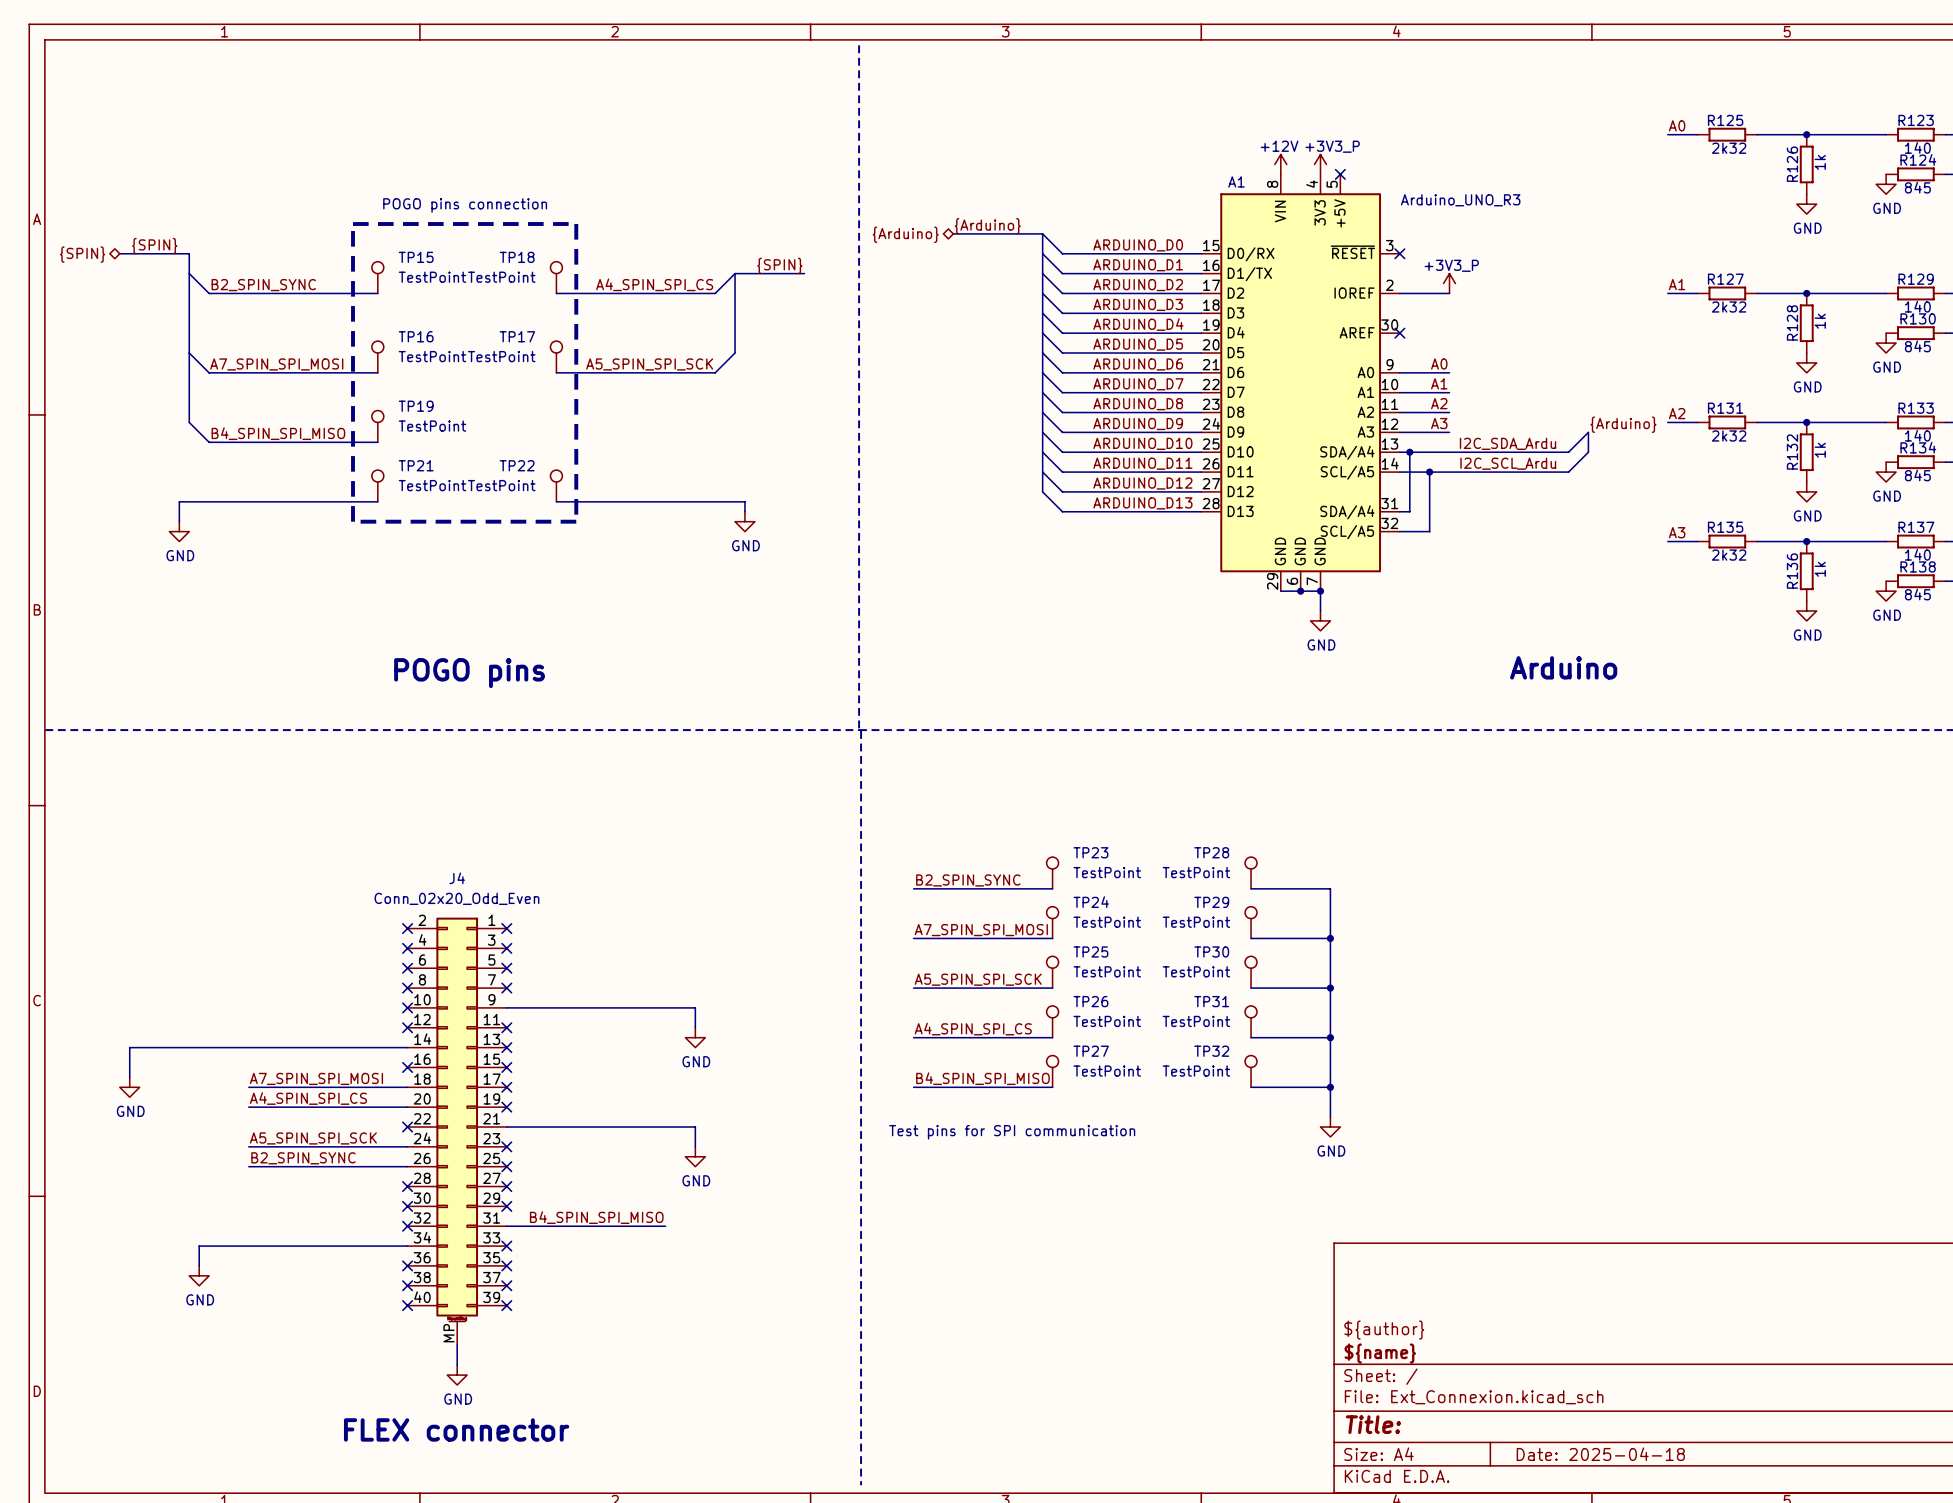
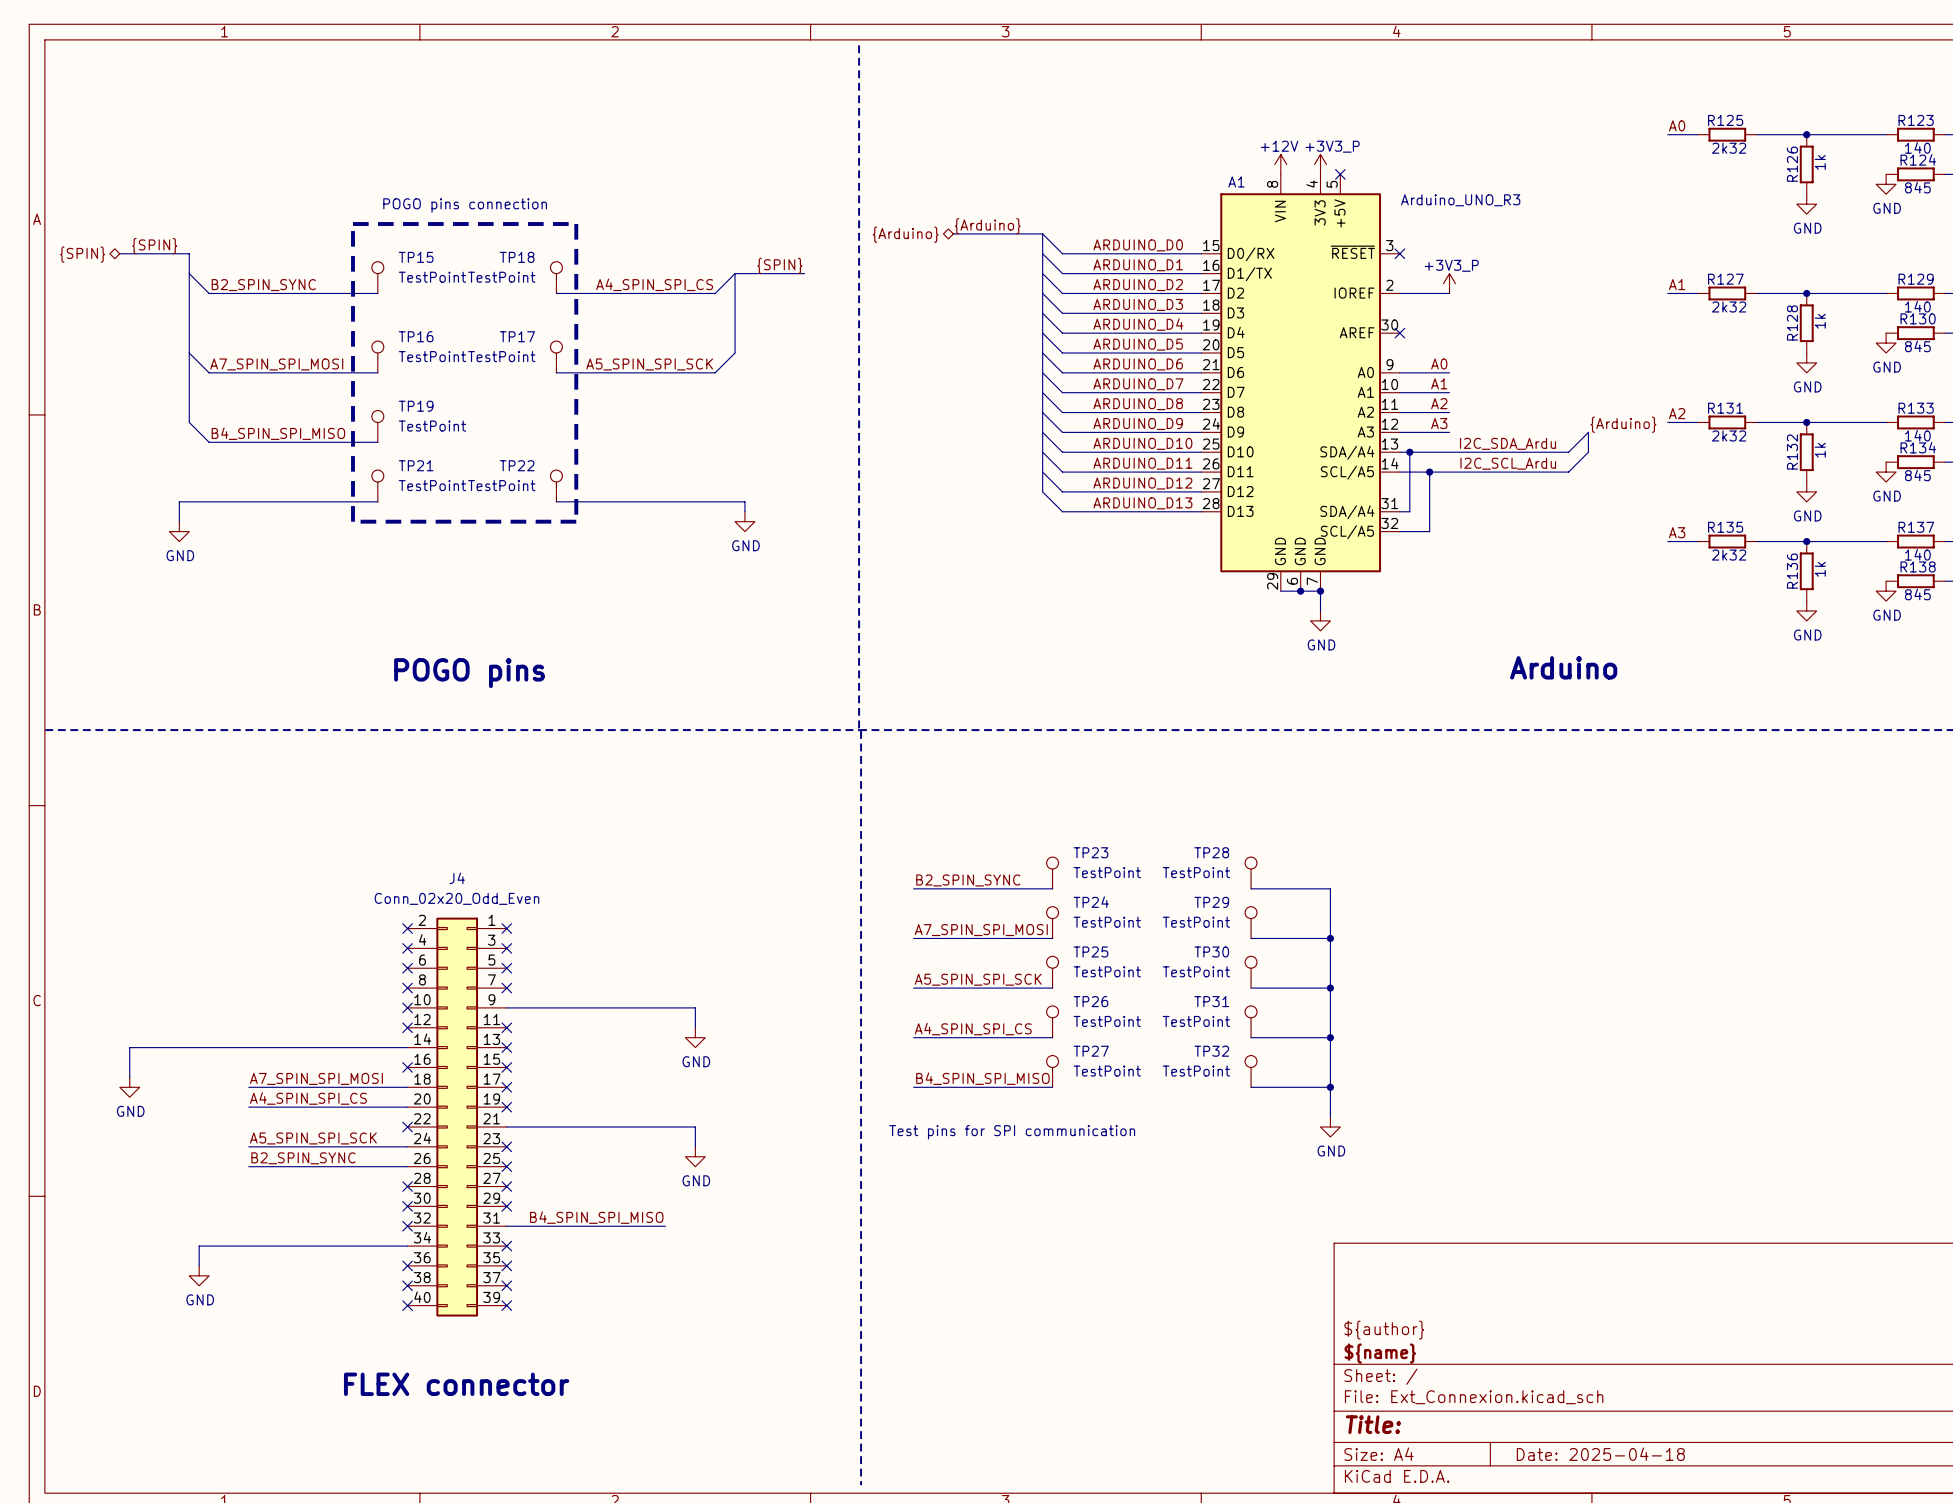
J4 symbol: [407, 917, 507, 1346] -> [407, 917, 507, 1317]
wire: (457, 1345) (457, 1365) -> none
power symbol: GND (457, 1375) -> none
text position: FLEX connector (456, 1429) -> FLEX connector (456, 1384)

